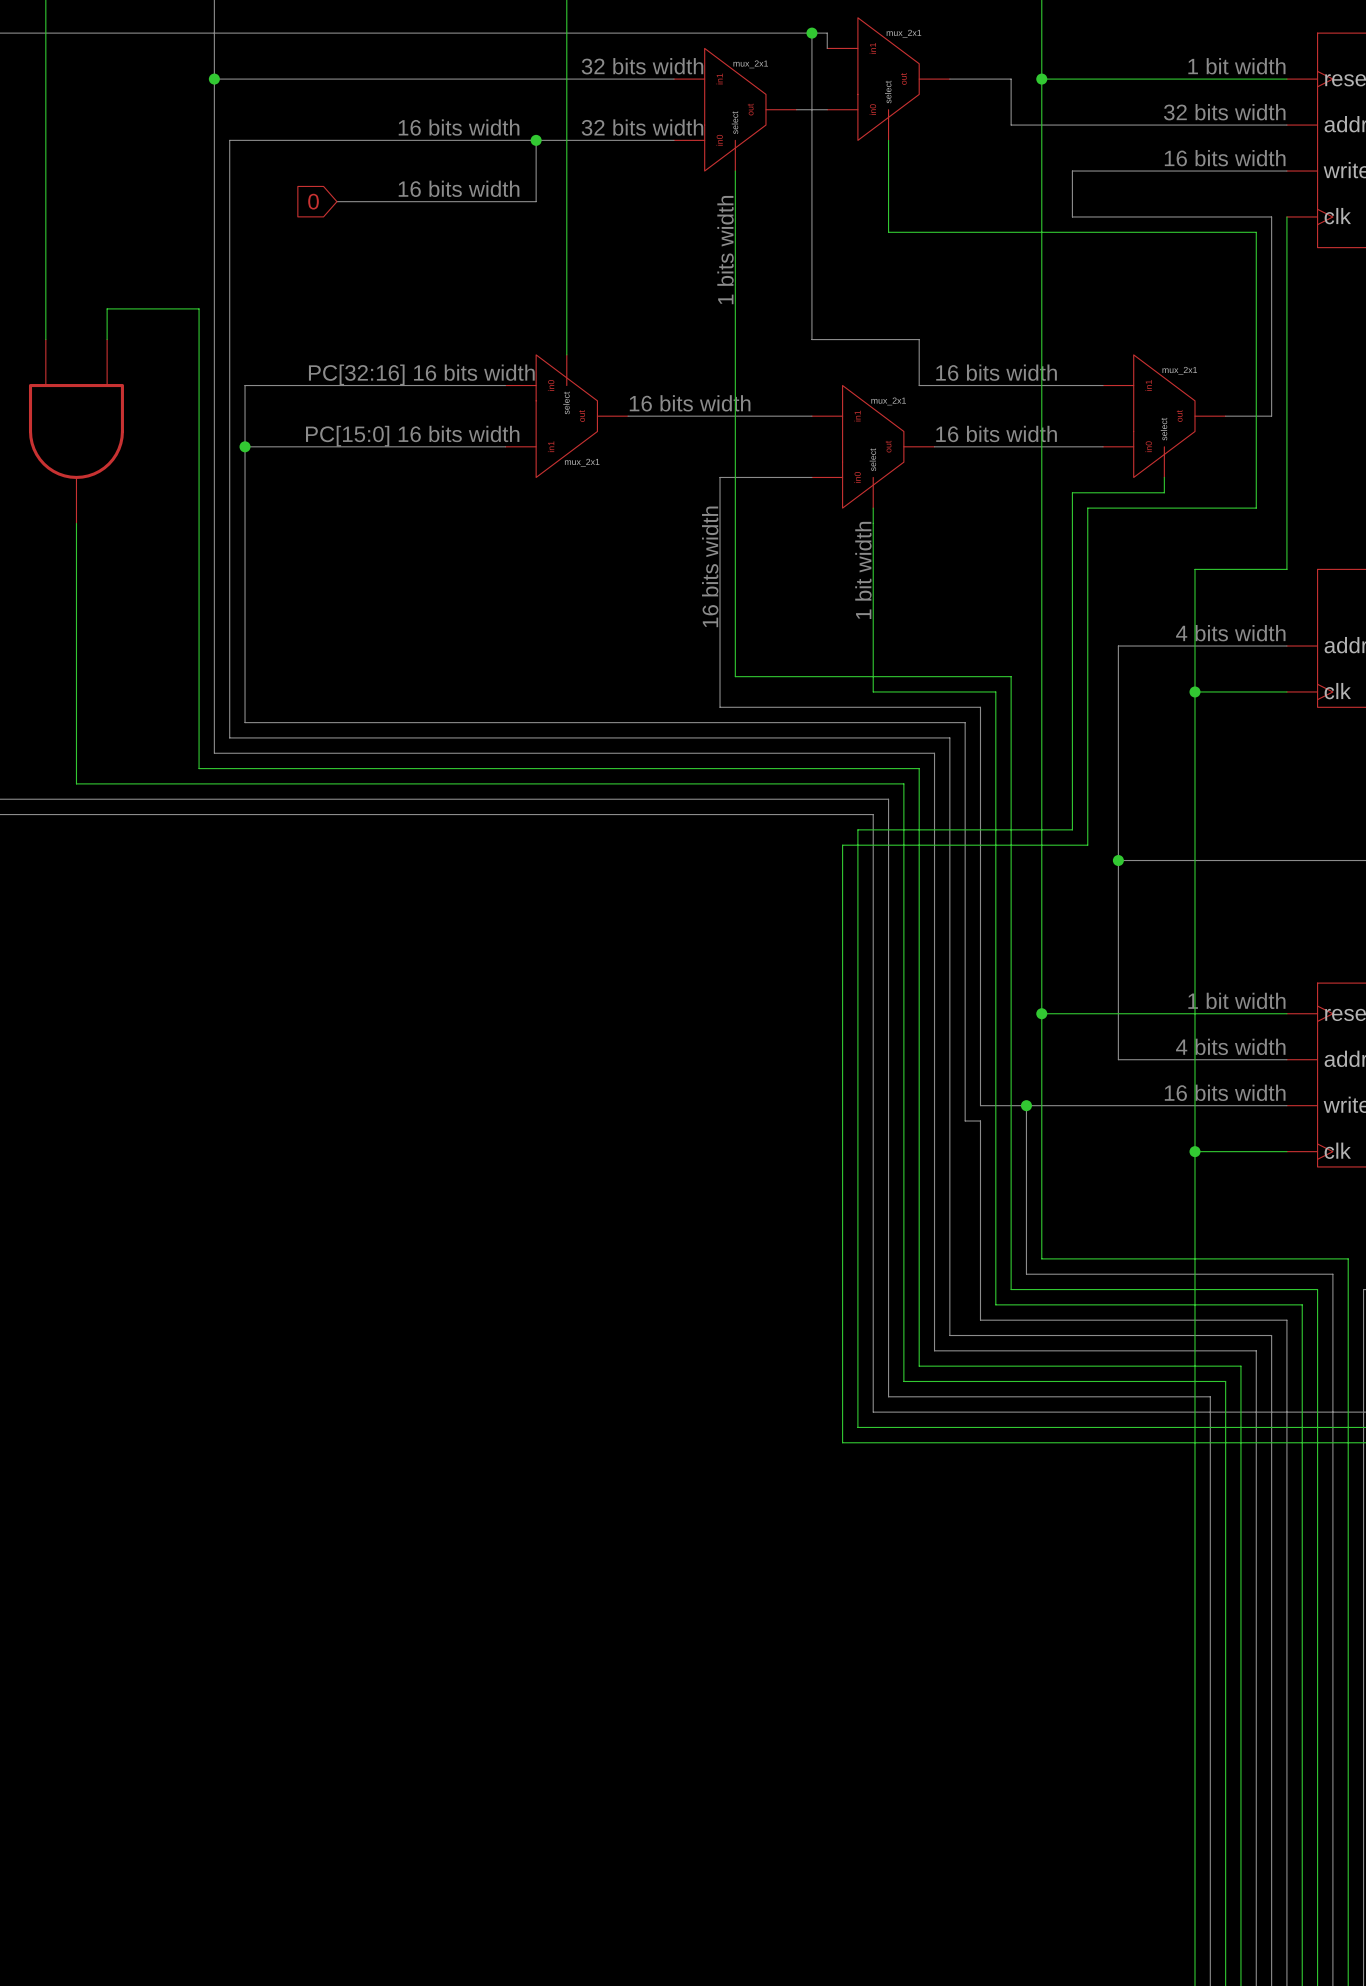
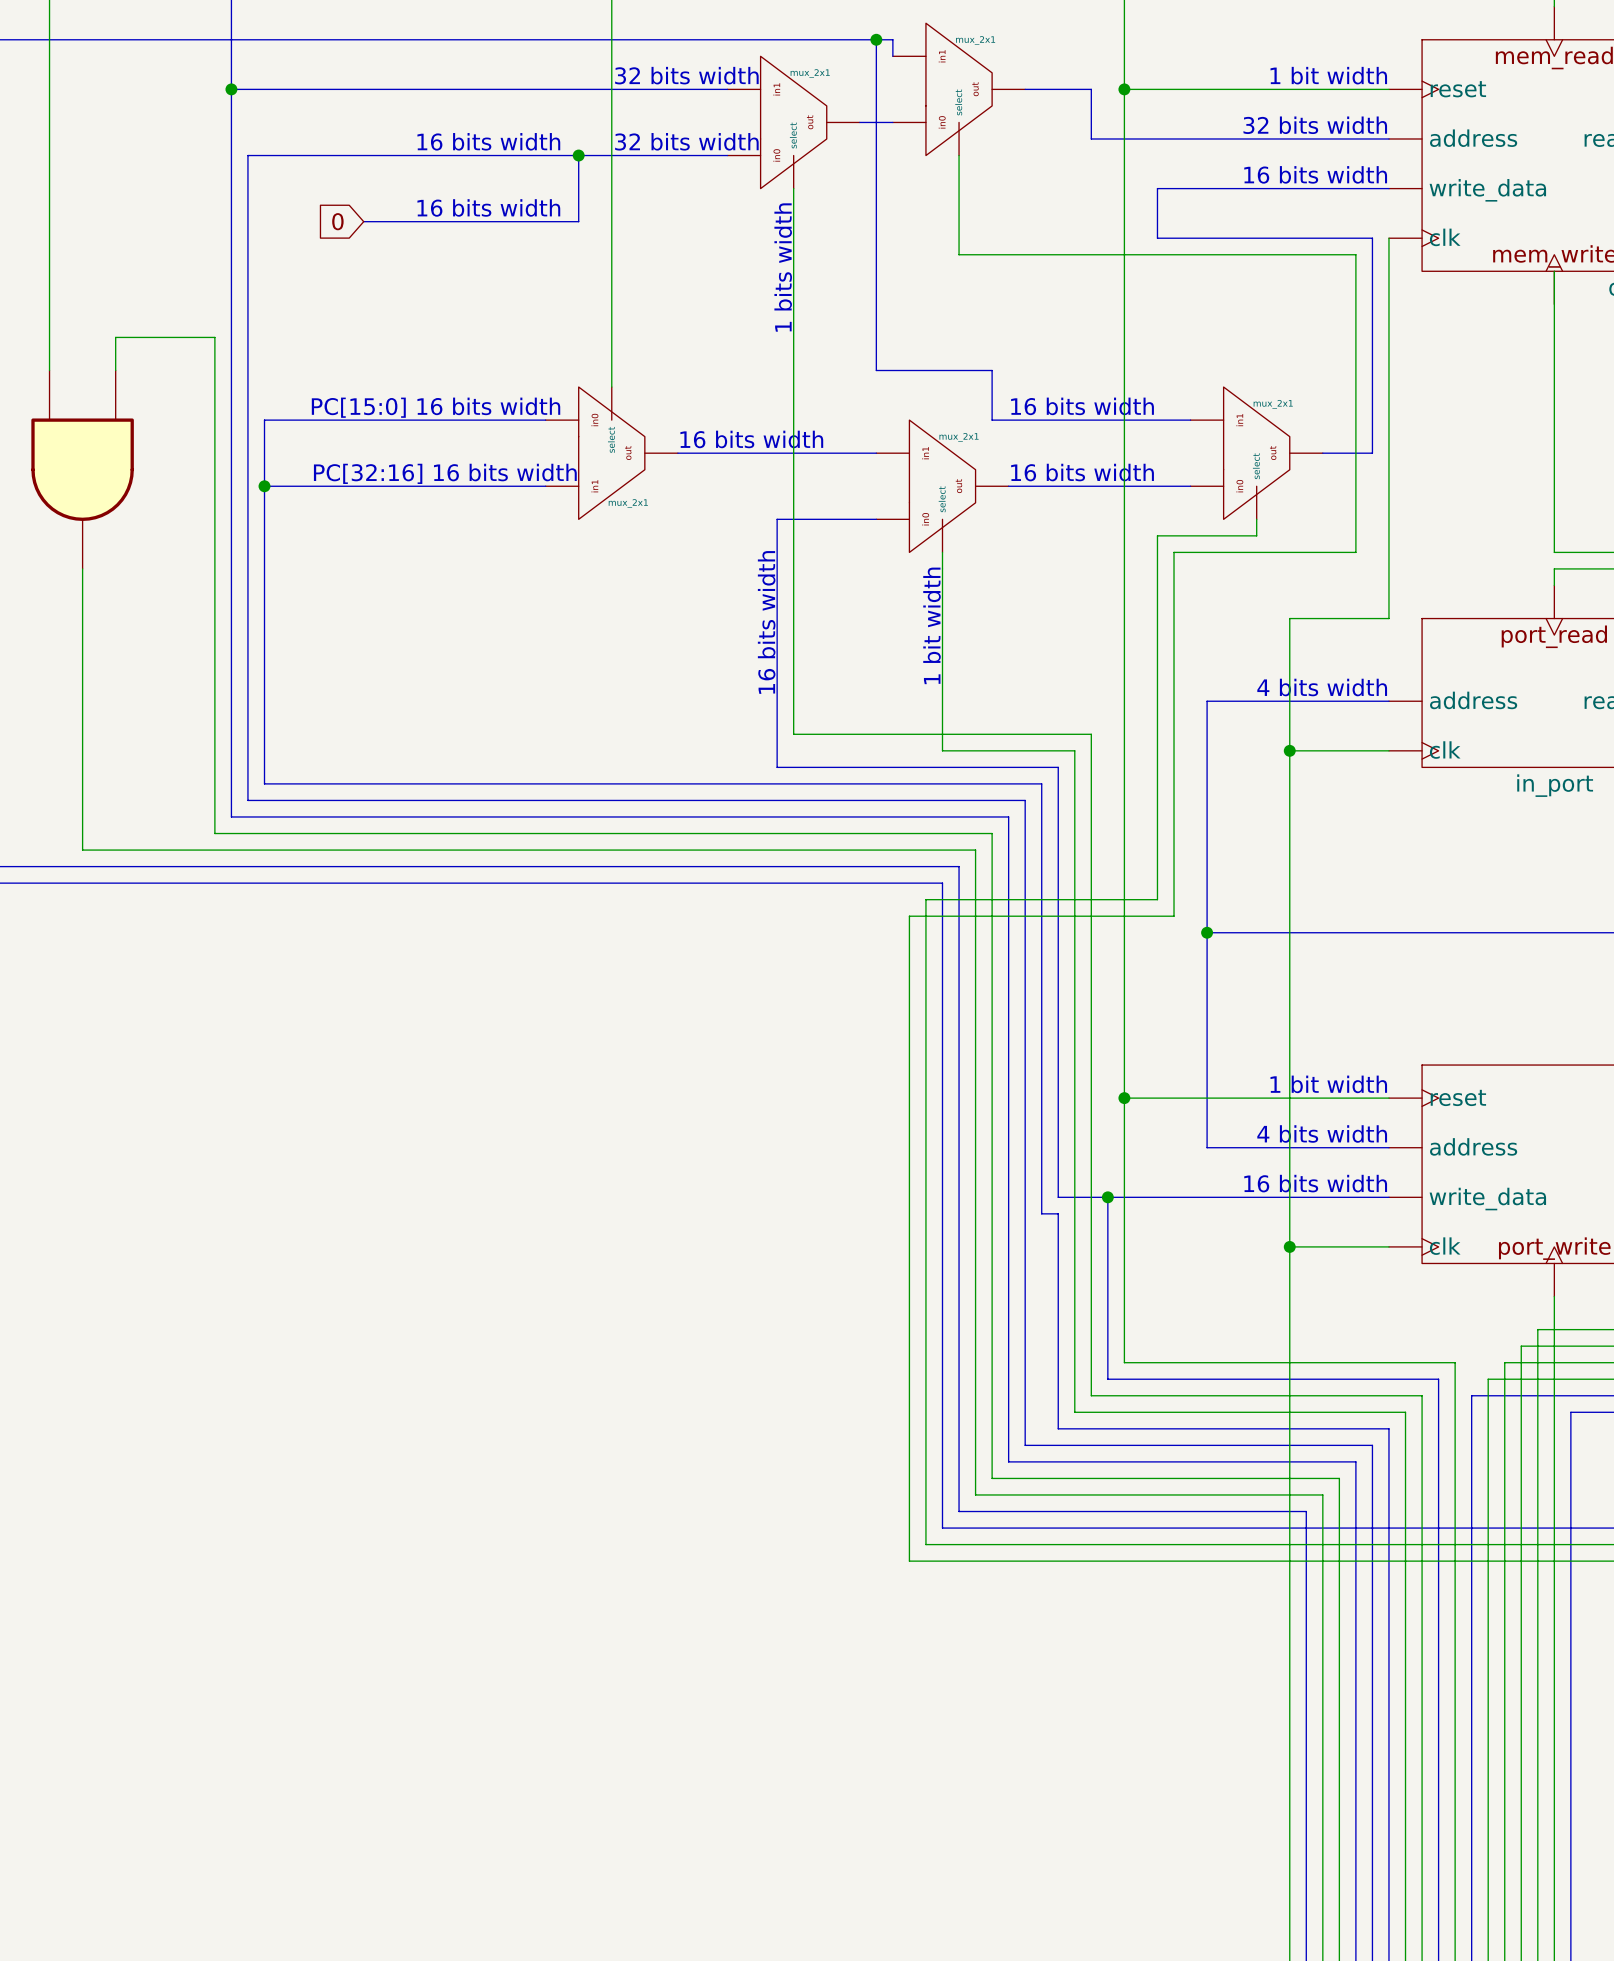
text position: PC[32:16] 16 bits width (421, 374) -> PC[32:16] 16 bits width (445, 473)
text position: PC[15:0] 16 bits width (412, 436) -> PC[15:0] 16 bits width (436, 407)

